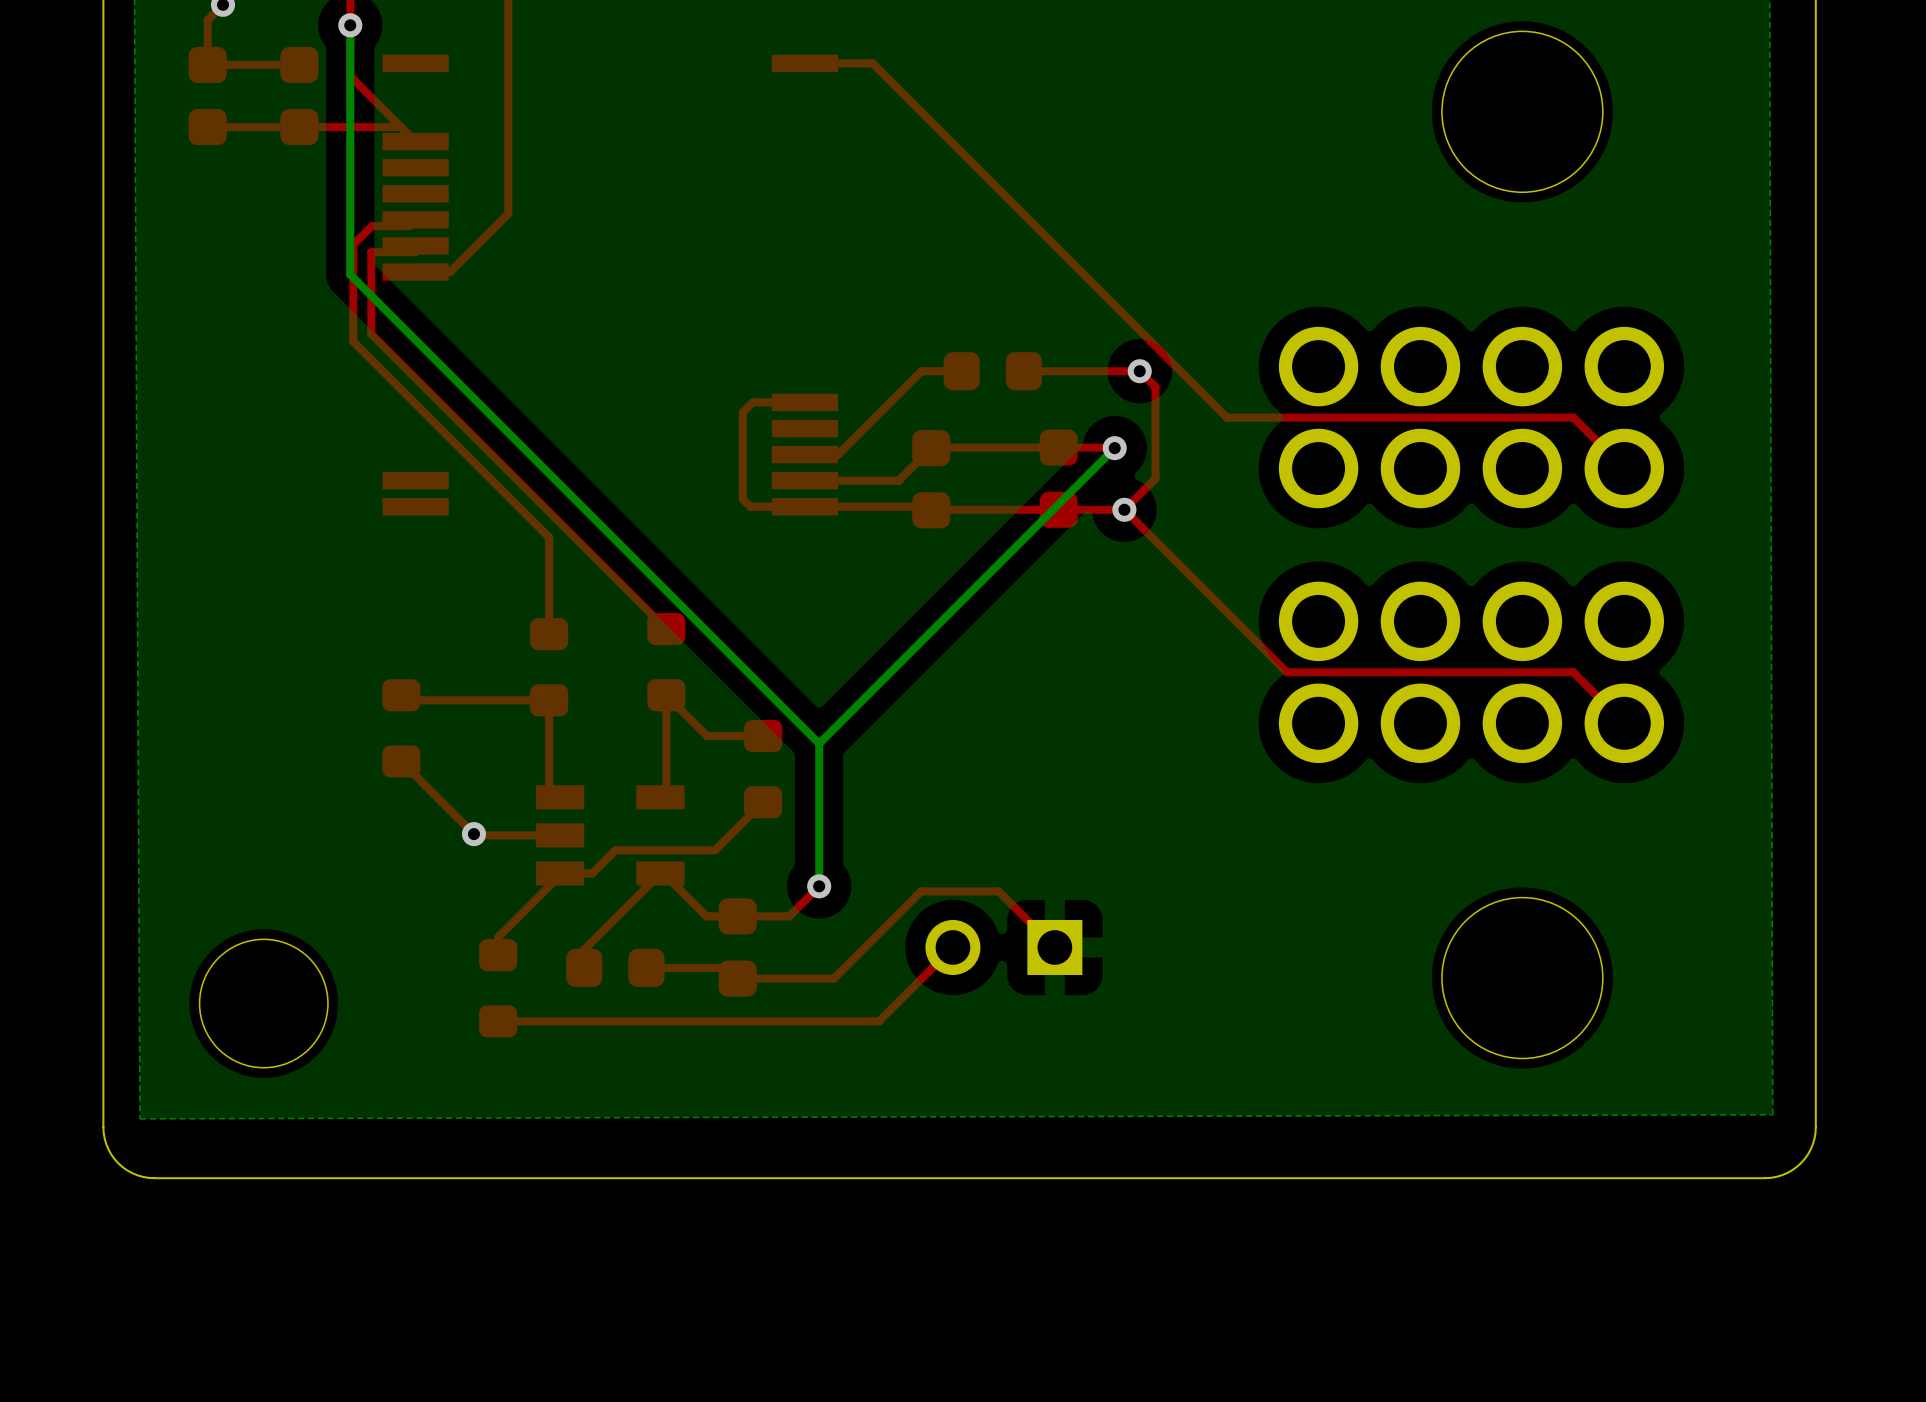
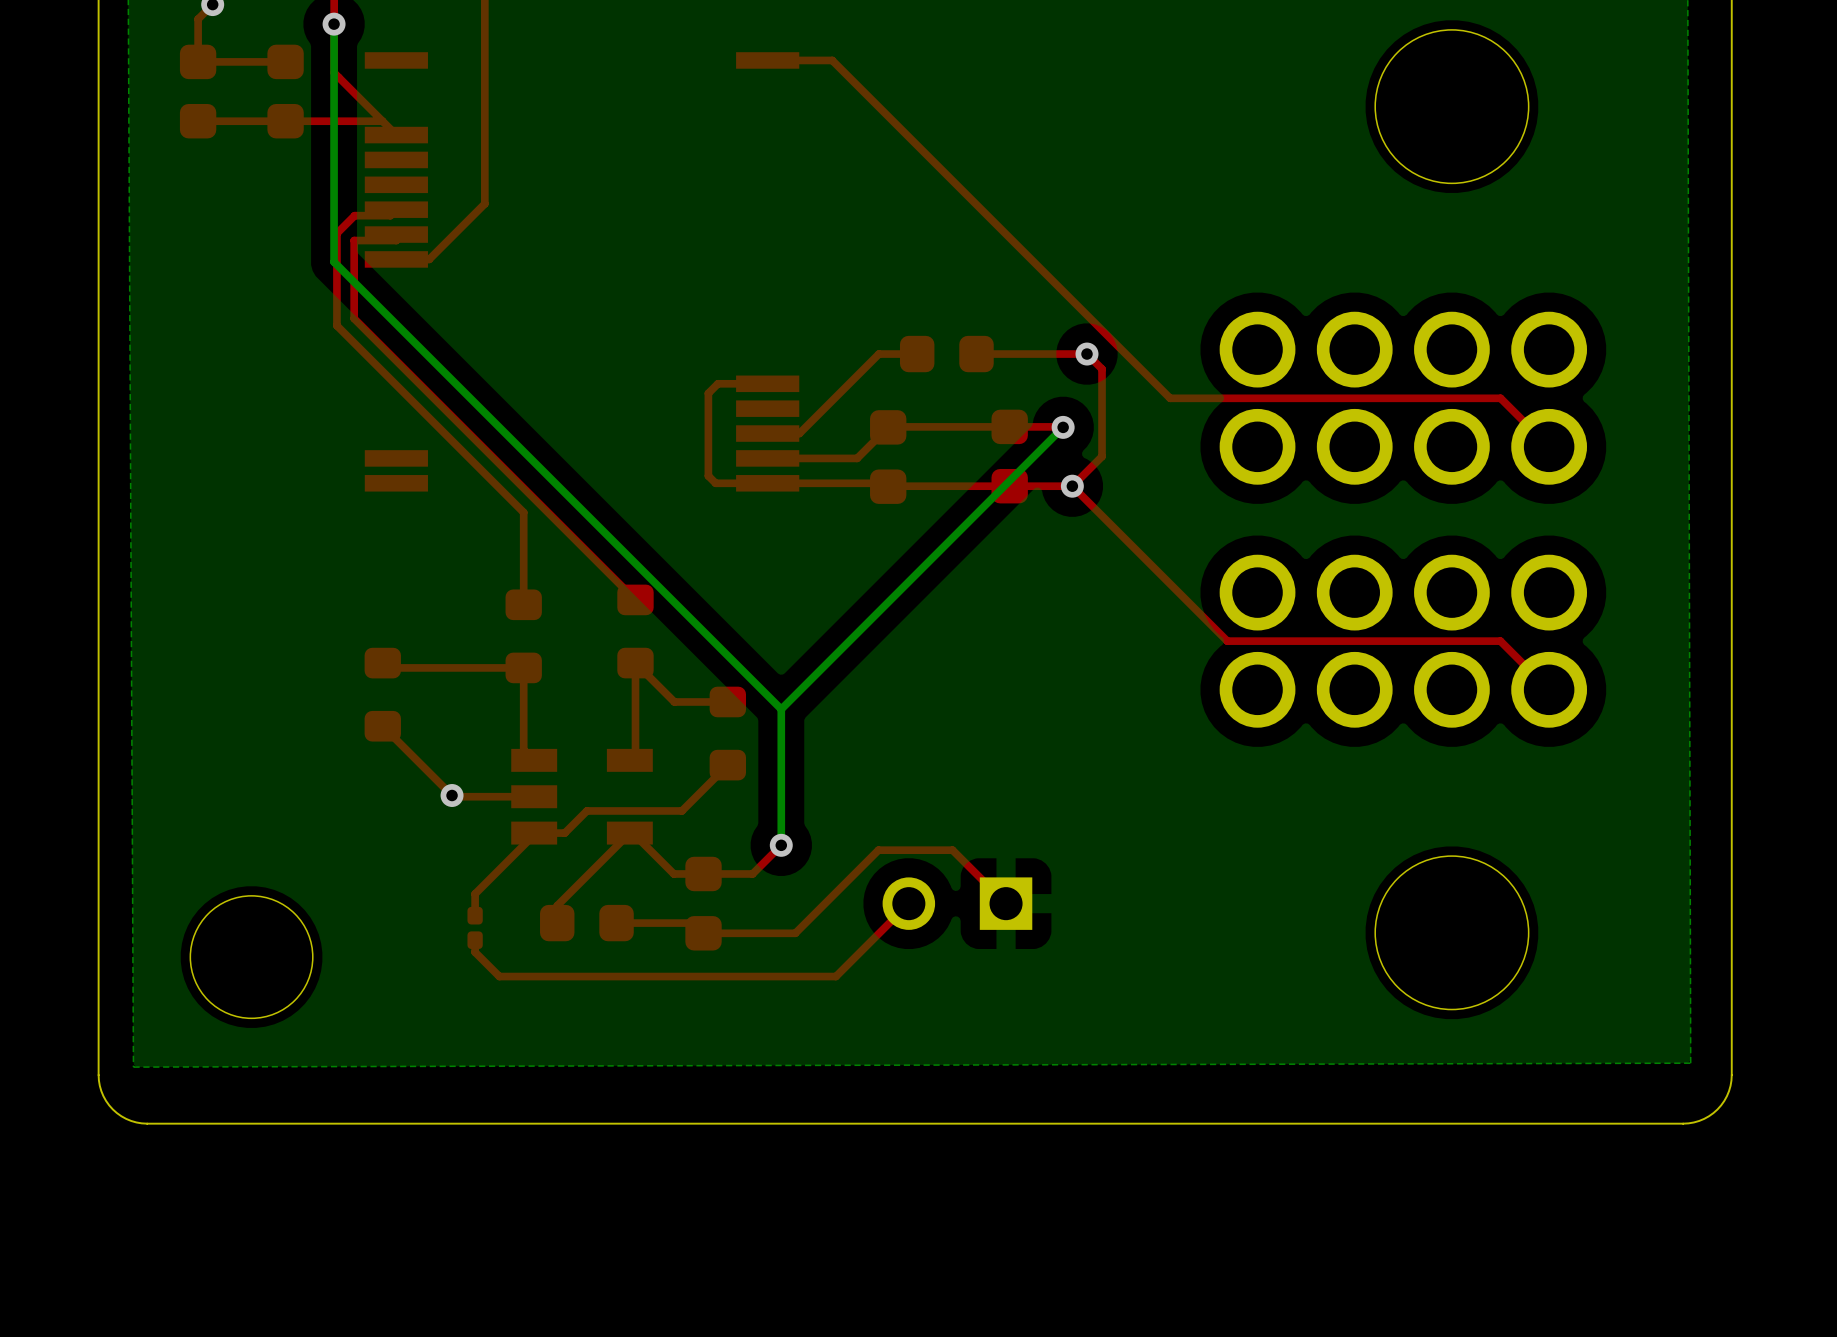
part footprint: [479, 939, 518, 1038] -> [467, 906, 483, 949]
top track: (879, 1021) (498, 1021) -> (838, 974) (835, 976) (499, 976) (475, 952) (475, 940)

